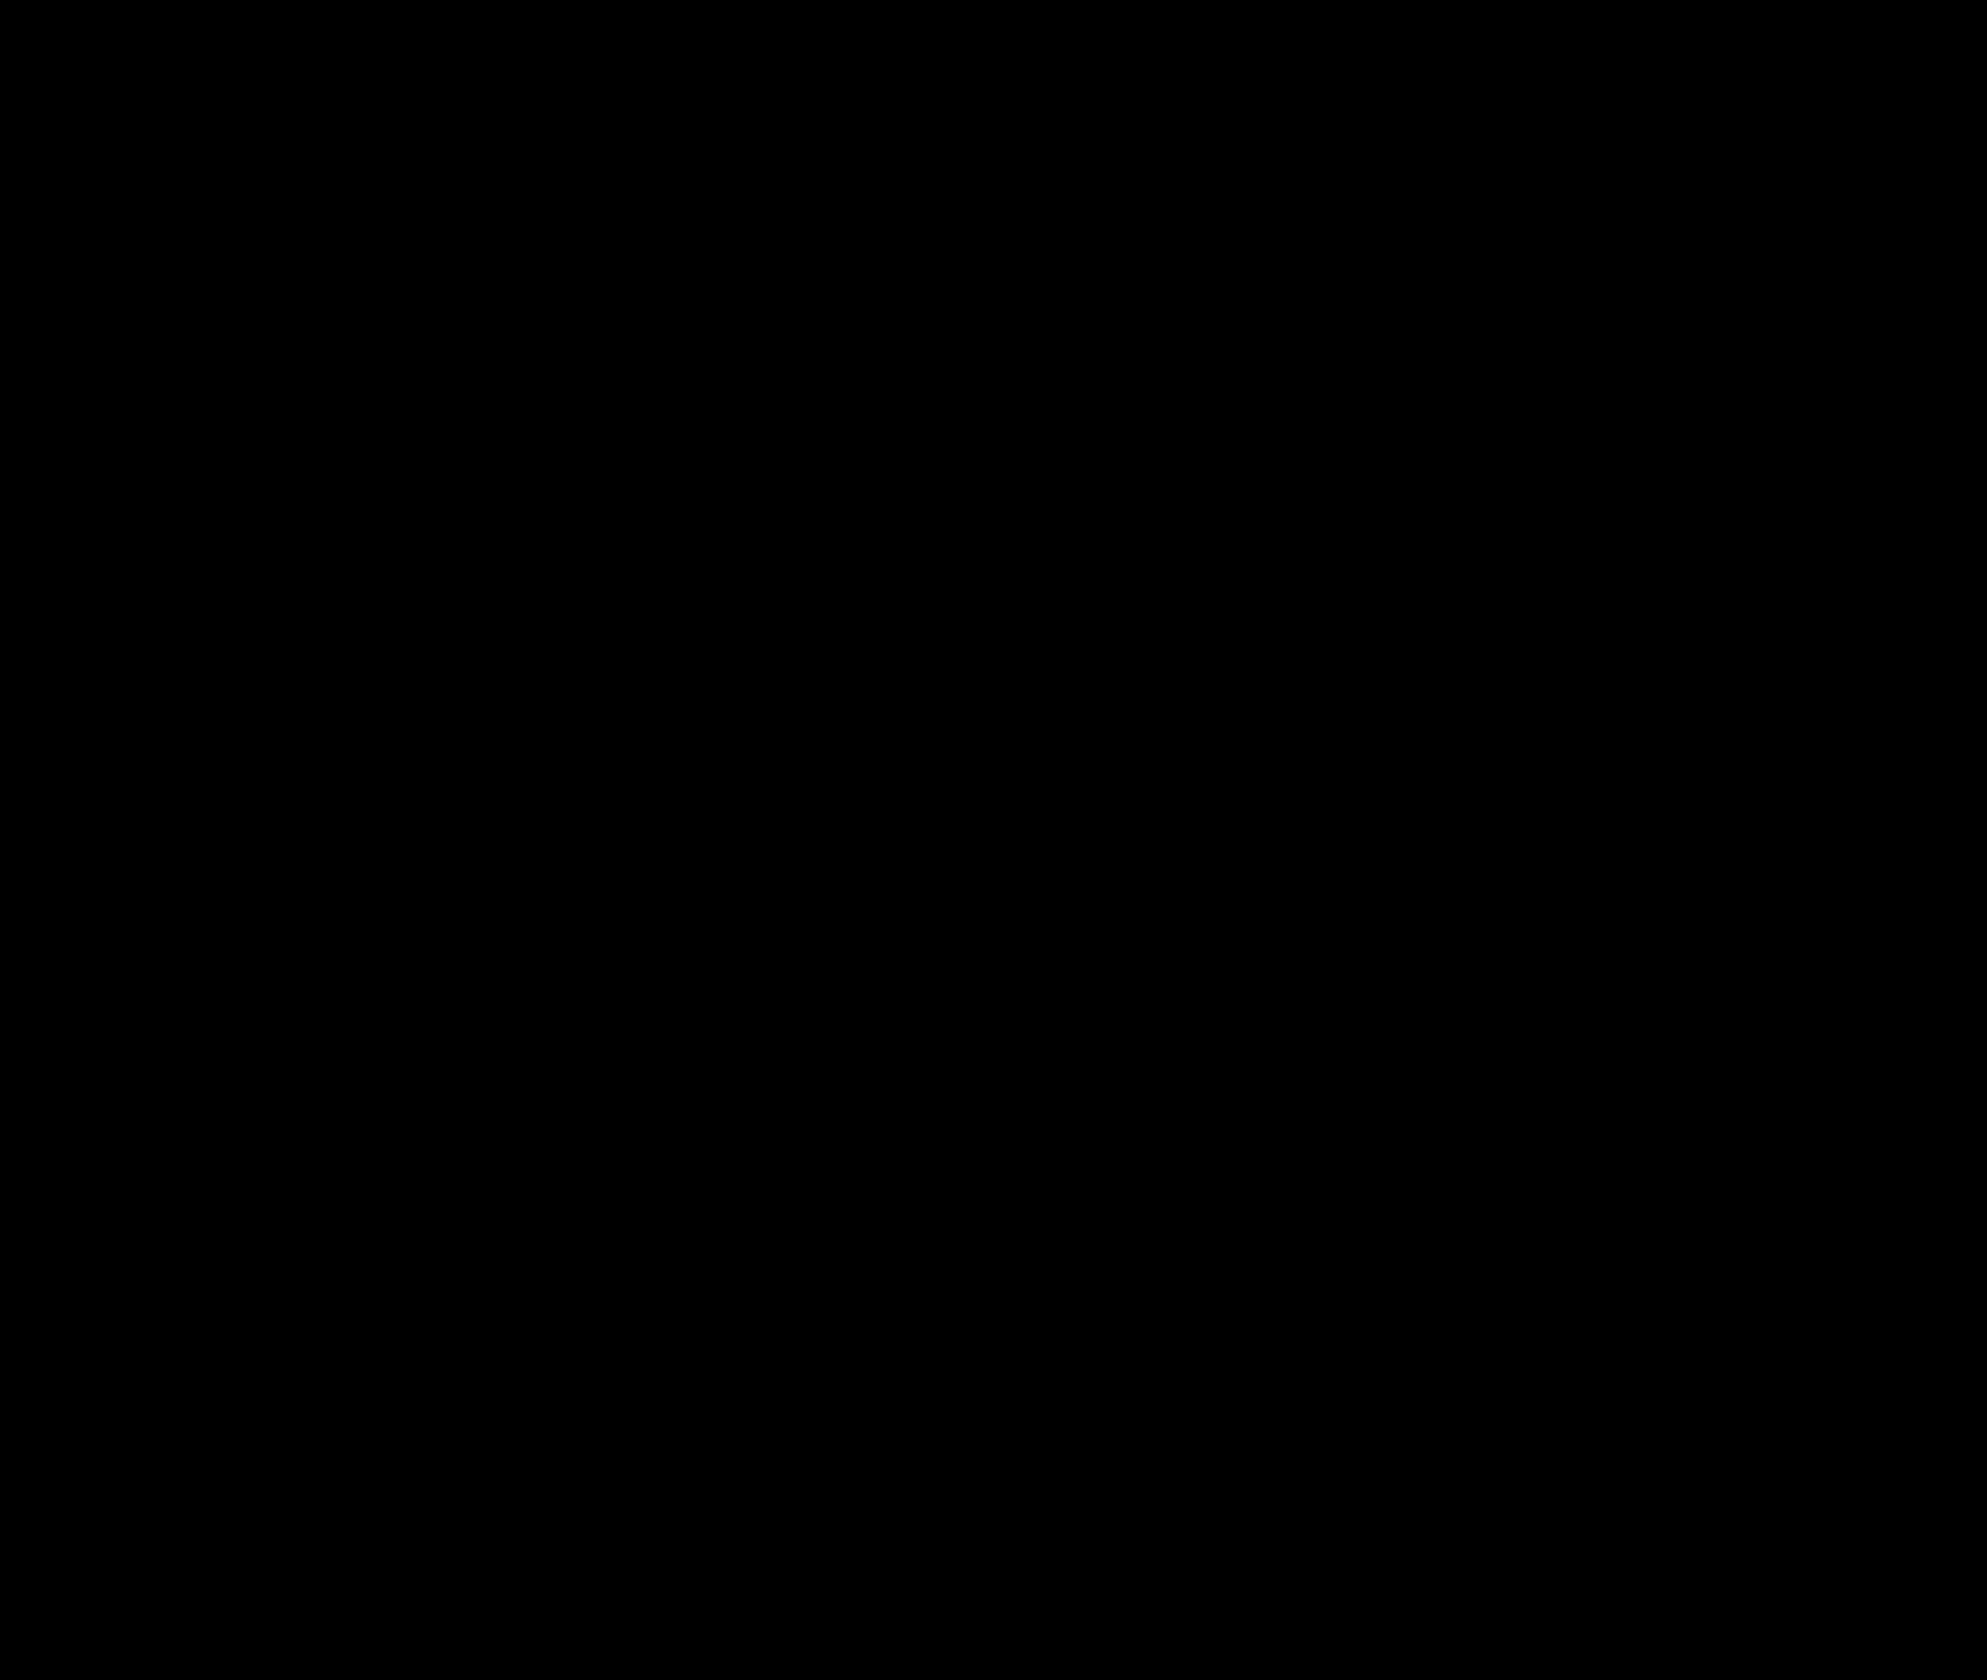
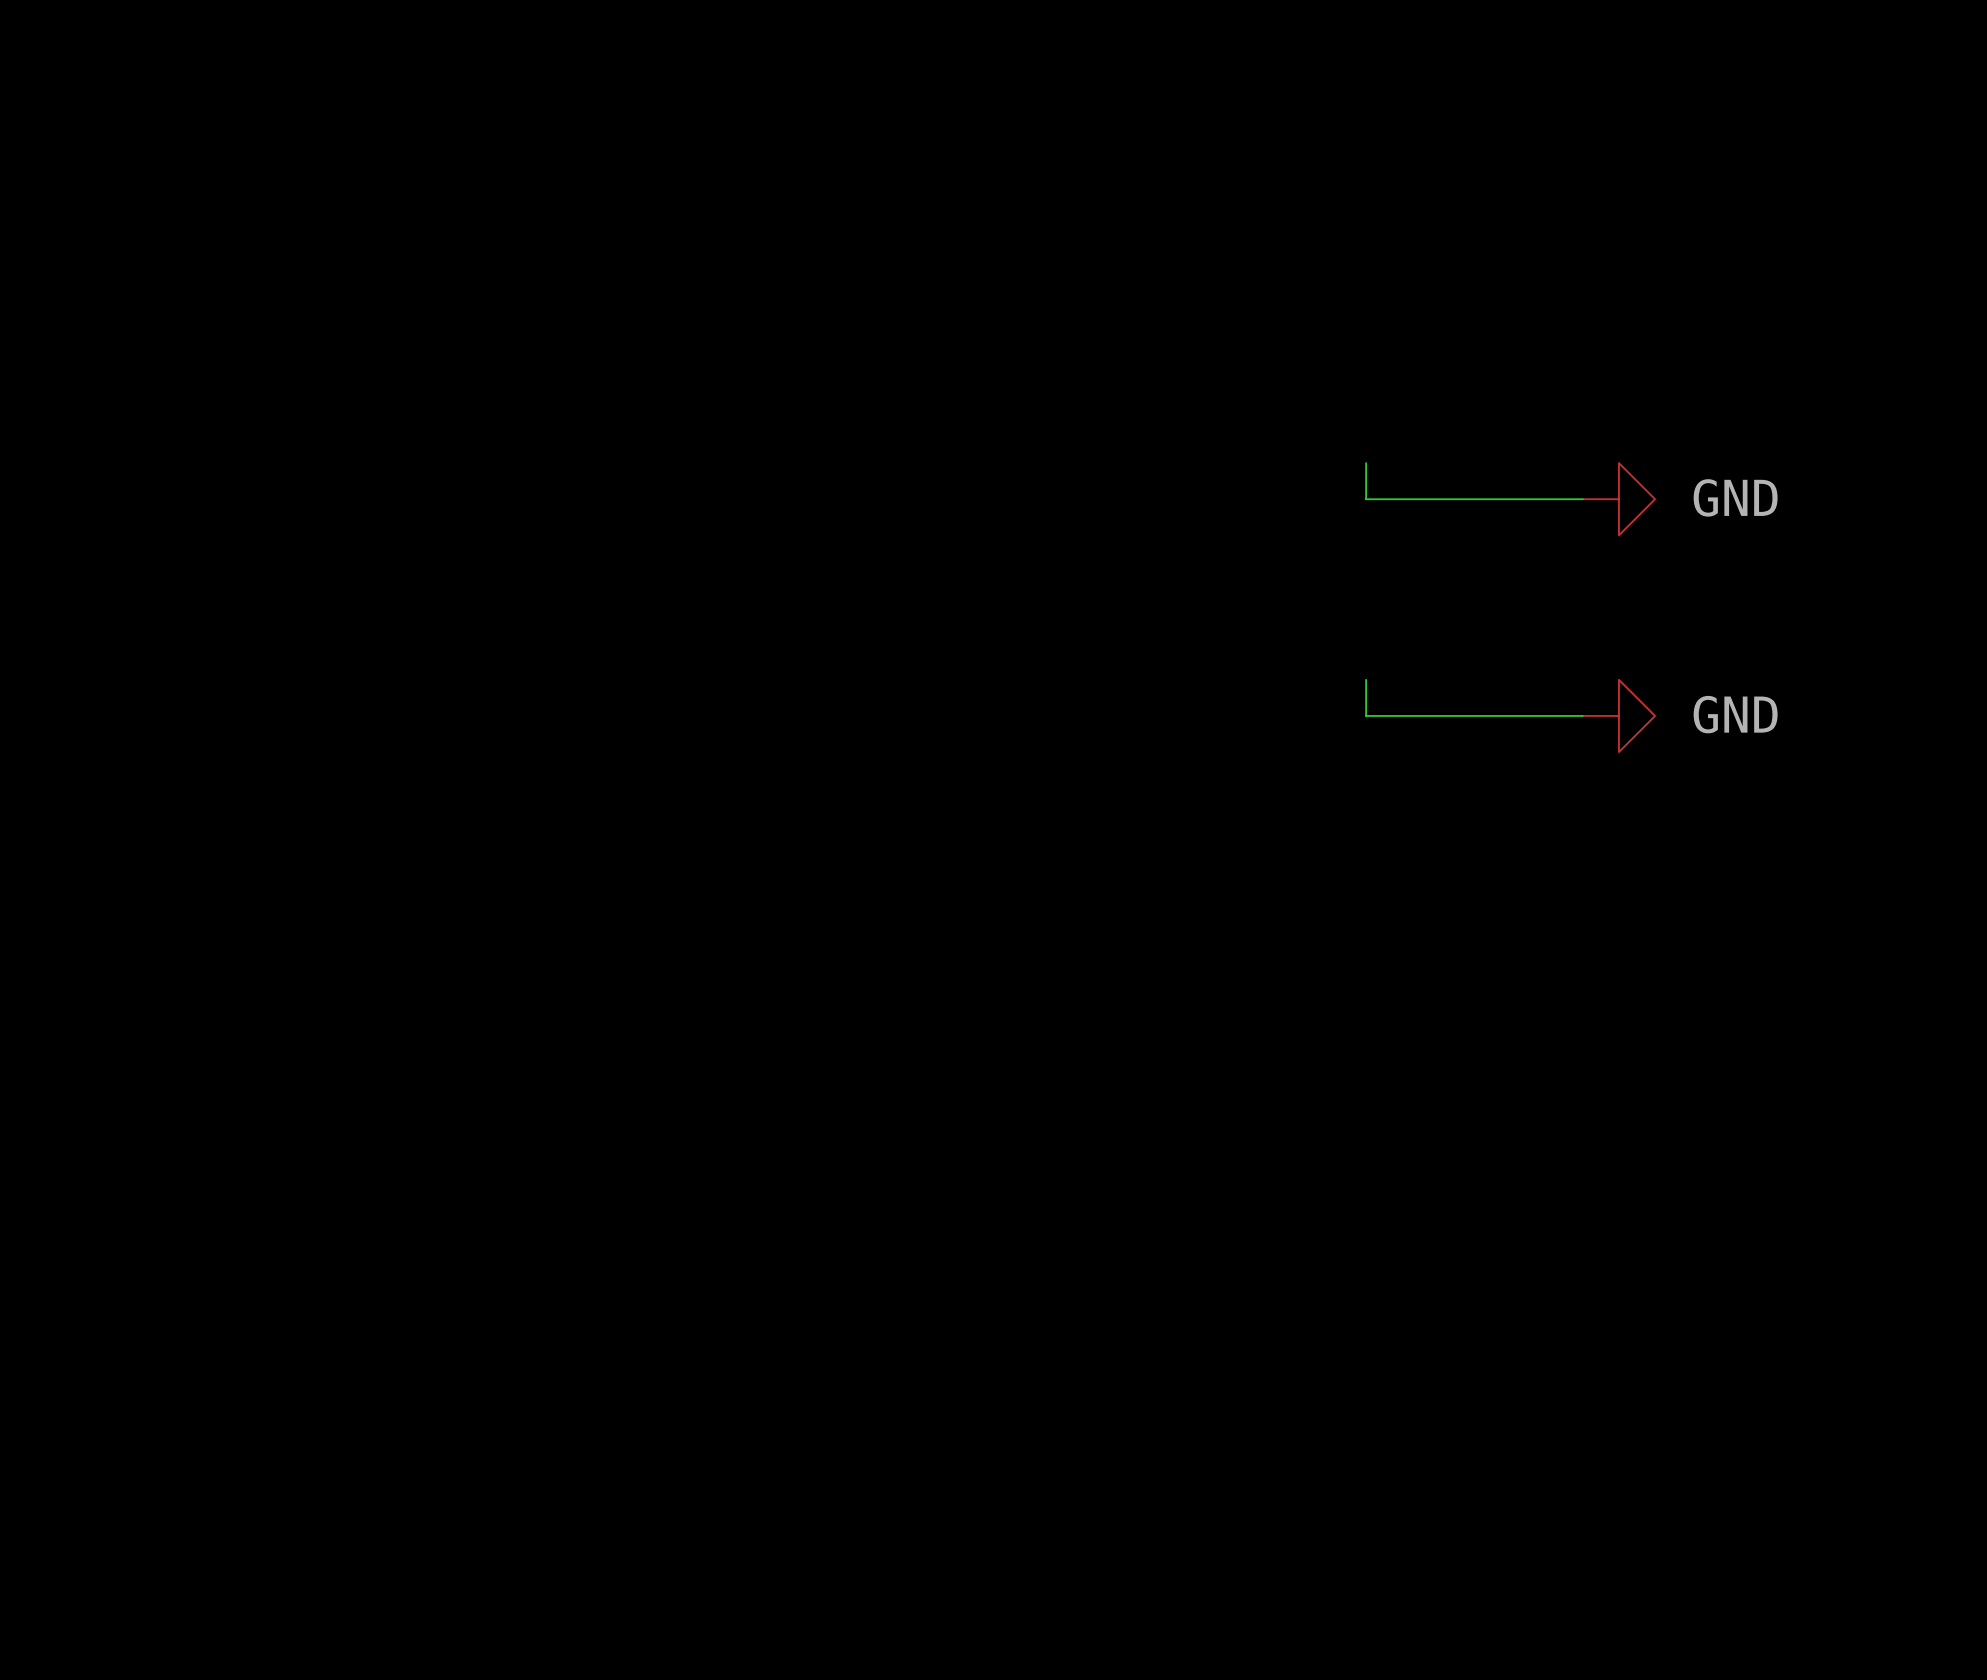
wire: none -> (1366, 463) (1366, 499) (1582, 499)
power symbol: none -> GND (1618, 499)
wire: none -> (1366, 679) (1366, 715) (1582, 715)
power symbol: none -> GND (1618, 715)

